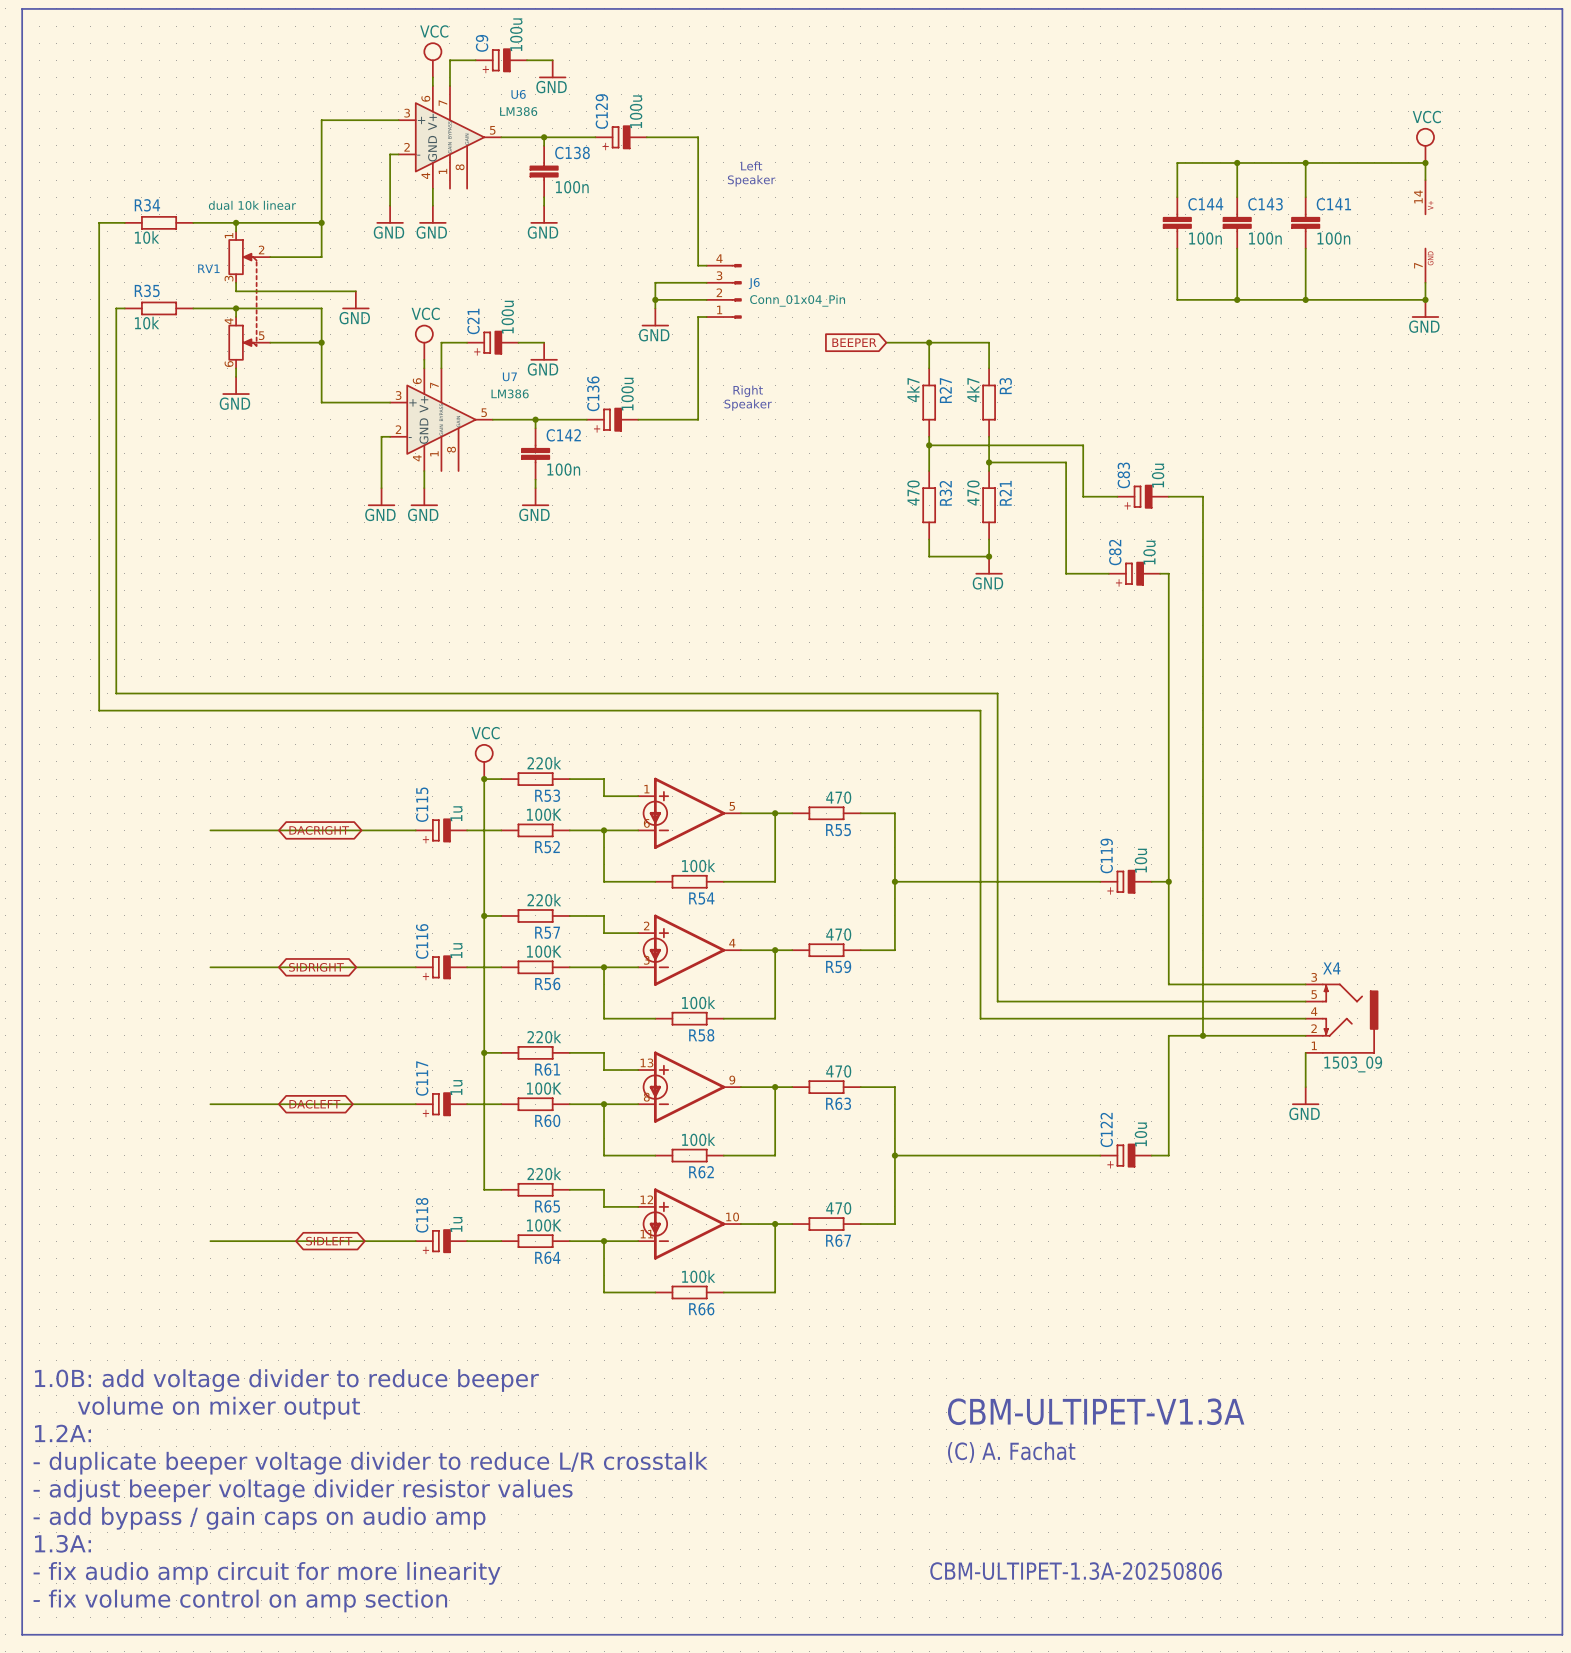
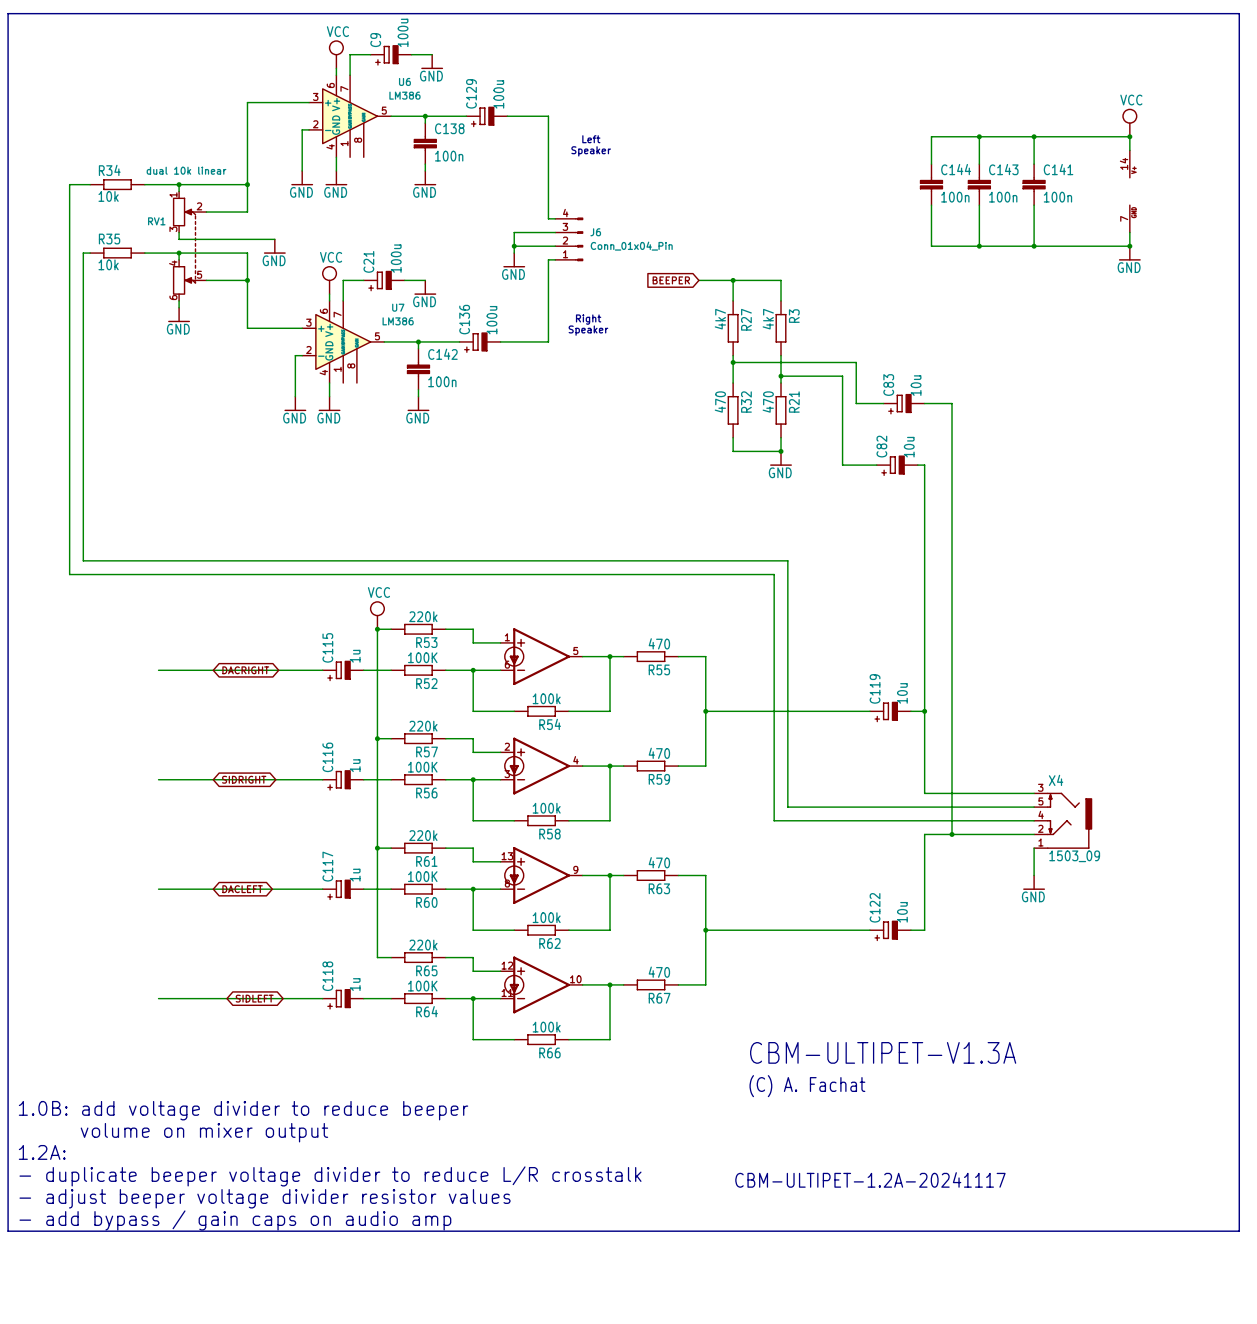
text position: CBM-ULTIPET-V1.3A (1096, 1411) -> CBM-ULTIPET-V1.3A (883, 1052)
text position: (C) A. Fachat (1011, 1452) -> (C) A. Fachat (807, 1086)
text: none -> CBM-ULTIPET-1.2A-20241117 (870, 1179)
line: (22, 1532) (22, 1634) (1562, 1634) (1562, 1532) -> (8, 1231) (1239, 1231)
text: 1.3A: (62, 1543) -> none
text: CBM-ULTIPET-1.3A-20250806 (1076, 1571) -> none
text: - fix audio amp circuit for more linearity (267, 1573) -> none
text: - fix volume control on amp section (240, 1600) -> none

